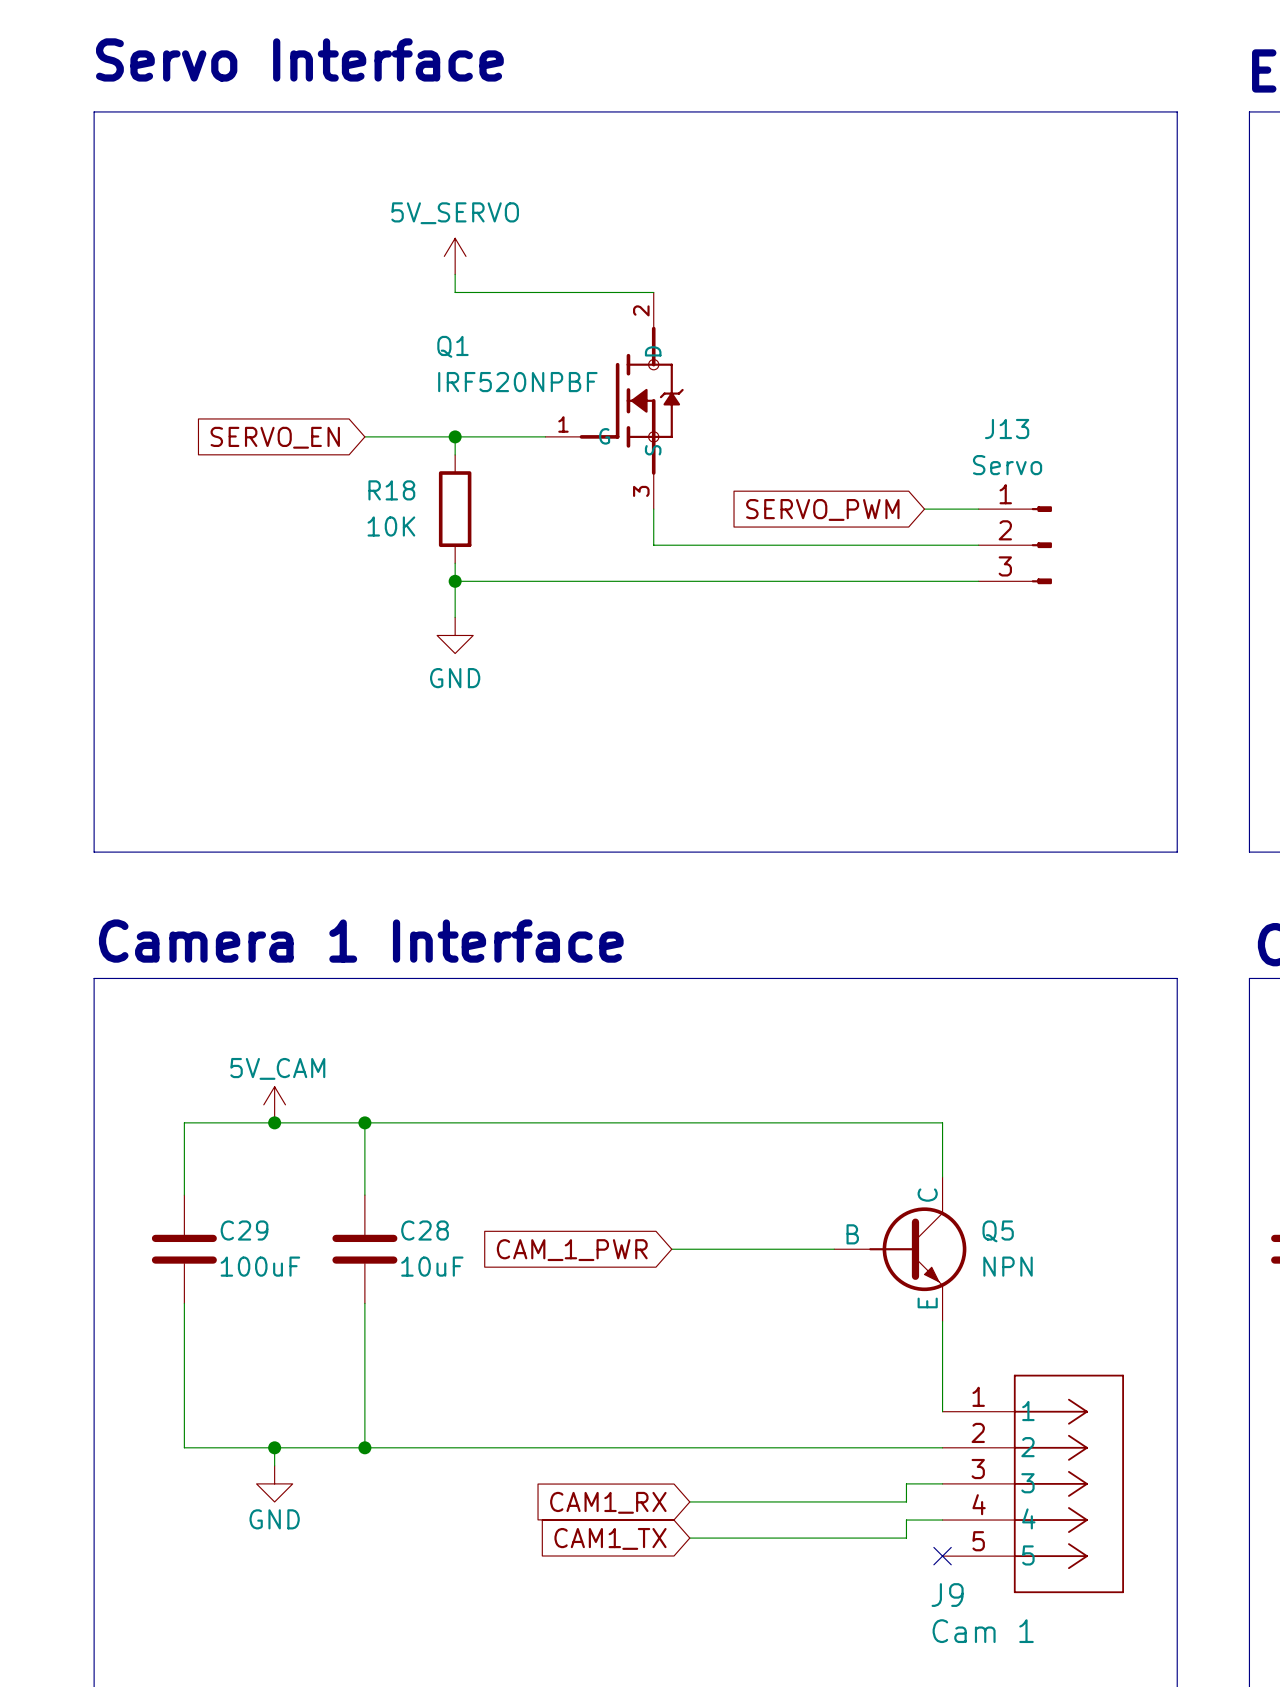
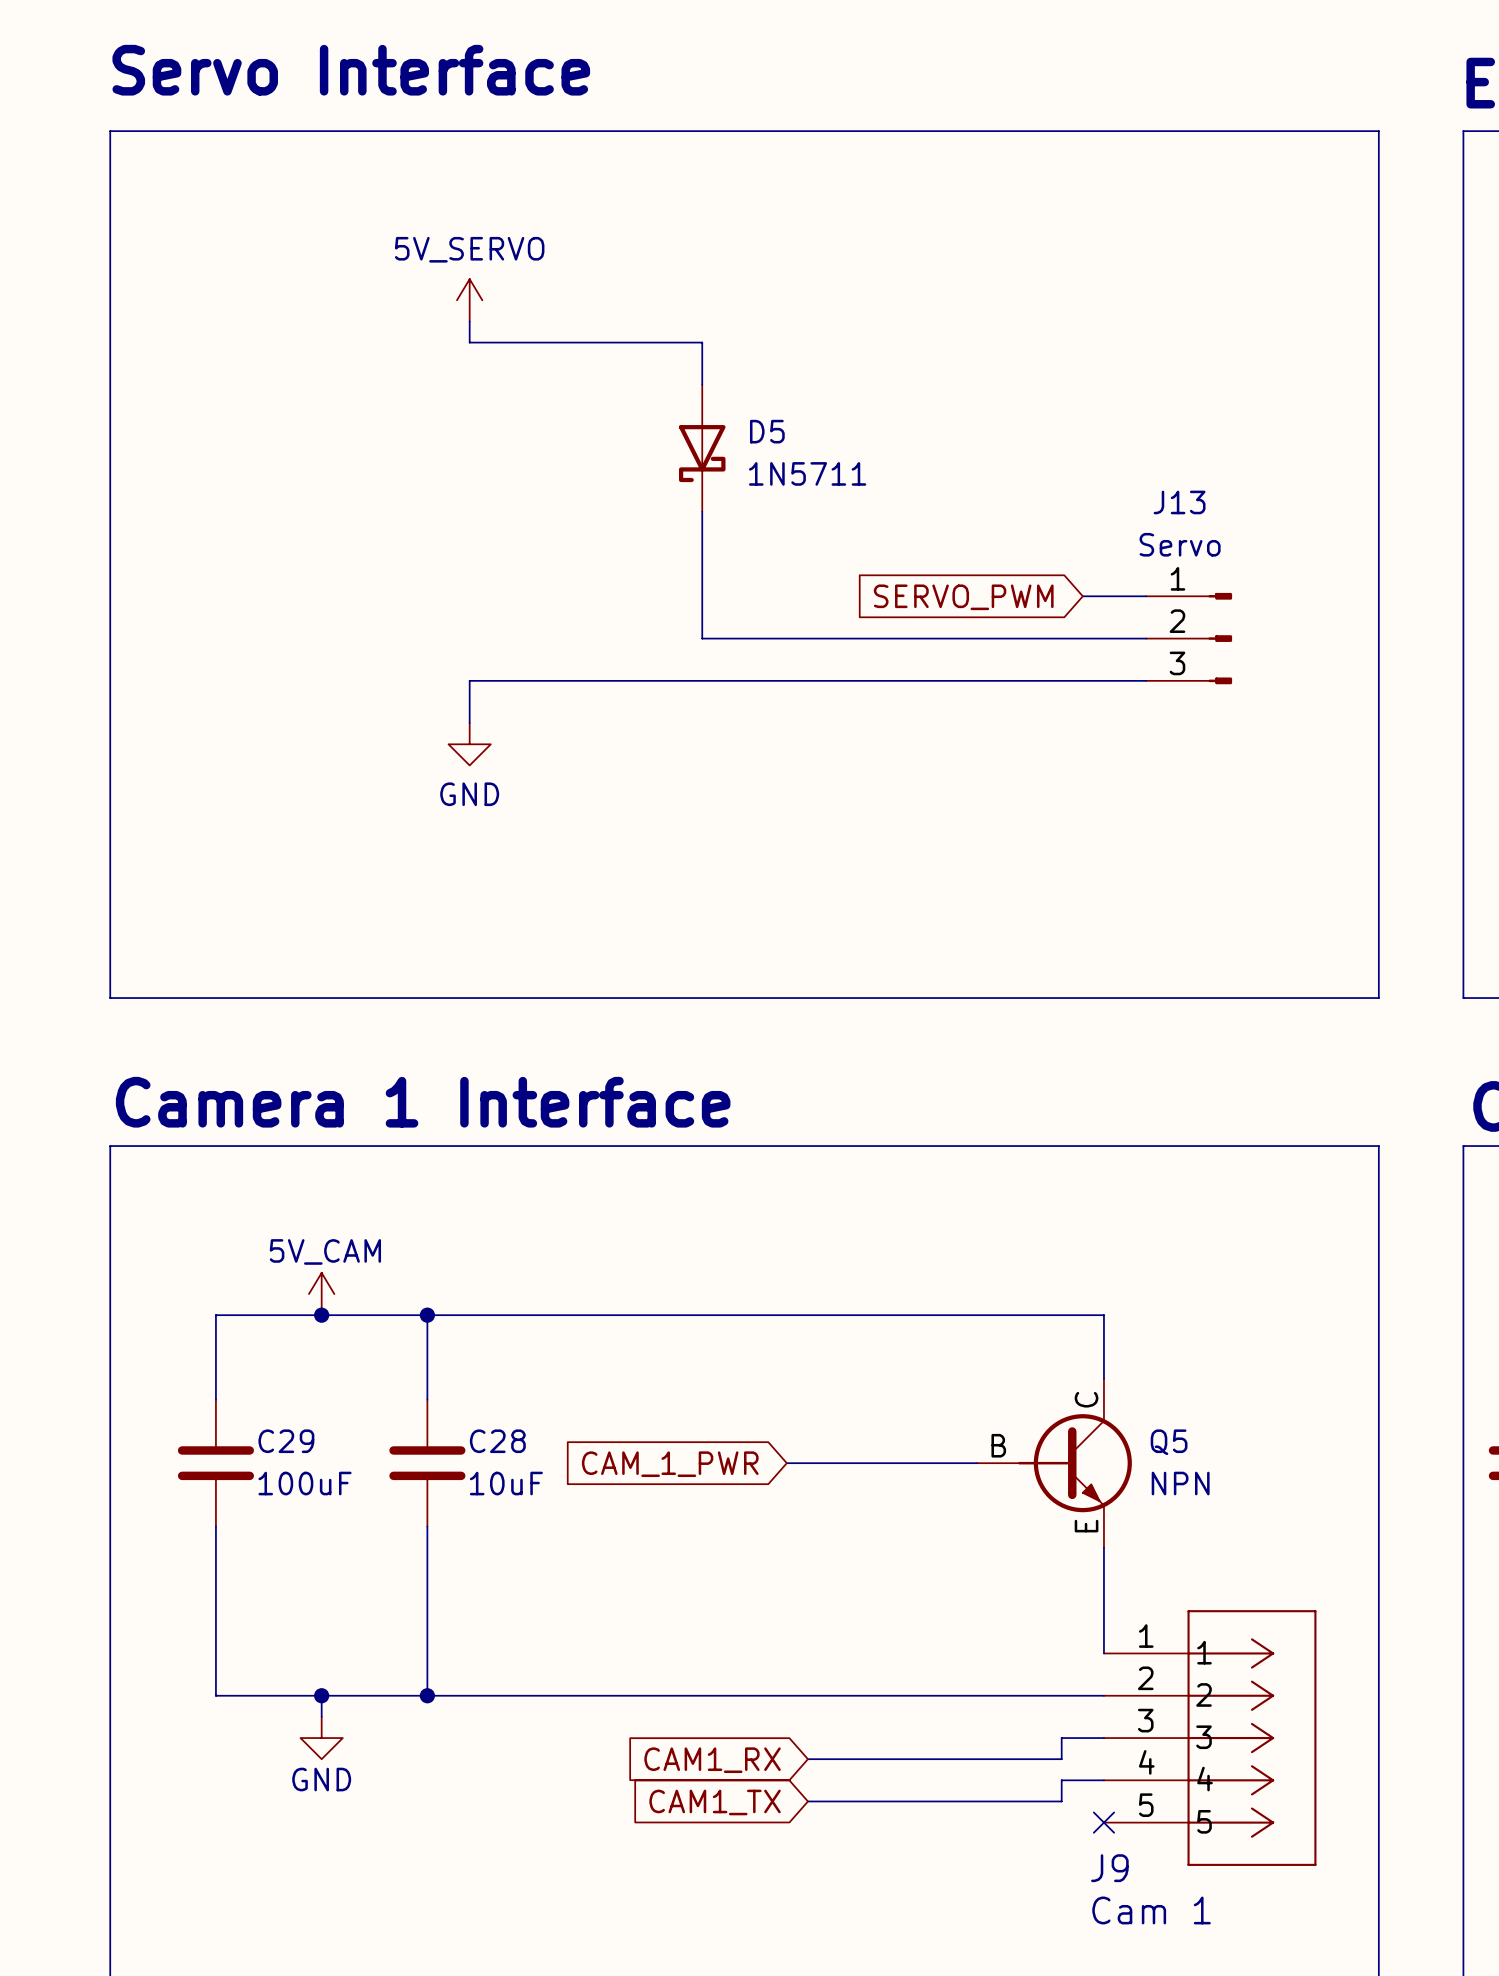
power symbol position: 5V_SERVO (455, 256) -> 5V_SERVO (469, 300)
wire: (455, 274) (455, 292) -> (469, 321) (469, 342) (533, 342)
wire: (599, 292) (653, 292) -> (702, 342) (702, 384)
D5: none -> 1N5711 (702, 448)
Q1: IRF520NPBF (614, 400) -> none
wire: (364, 436) (545, 436) -> none
wire: (455, 436) (455, 454) -> none
junction: (455, 436) -> none
global label: SERVO_EN (275, 437) -> none
R18: 10K (455, 509) -> none
wire: (653, 509) (653, 545) -> (702, 511) (702, 638) (765, 638)
wire: (455, 563) (455, 617) -> none
wire: none -> (533, 680) (469, 680) (469, 723)
junction: (455, 581) -> none
power symbol position: GND (455, 635) -> GND (469, 744)

